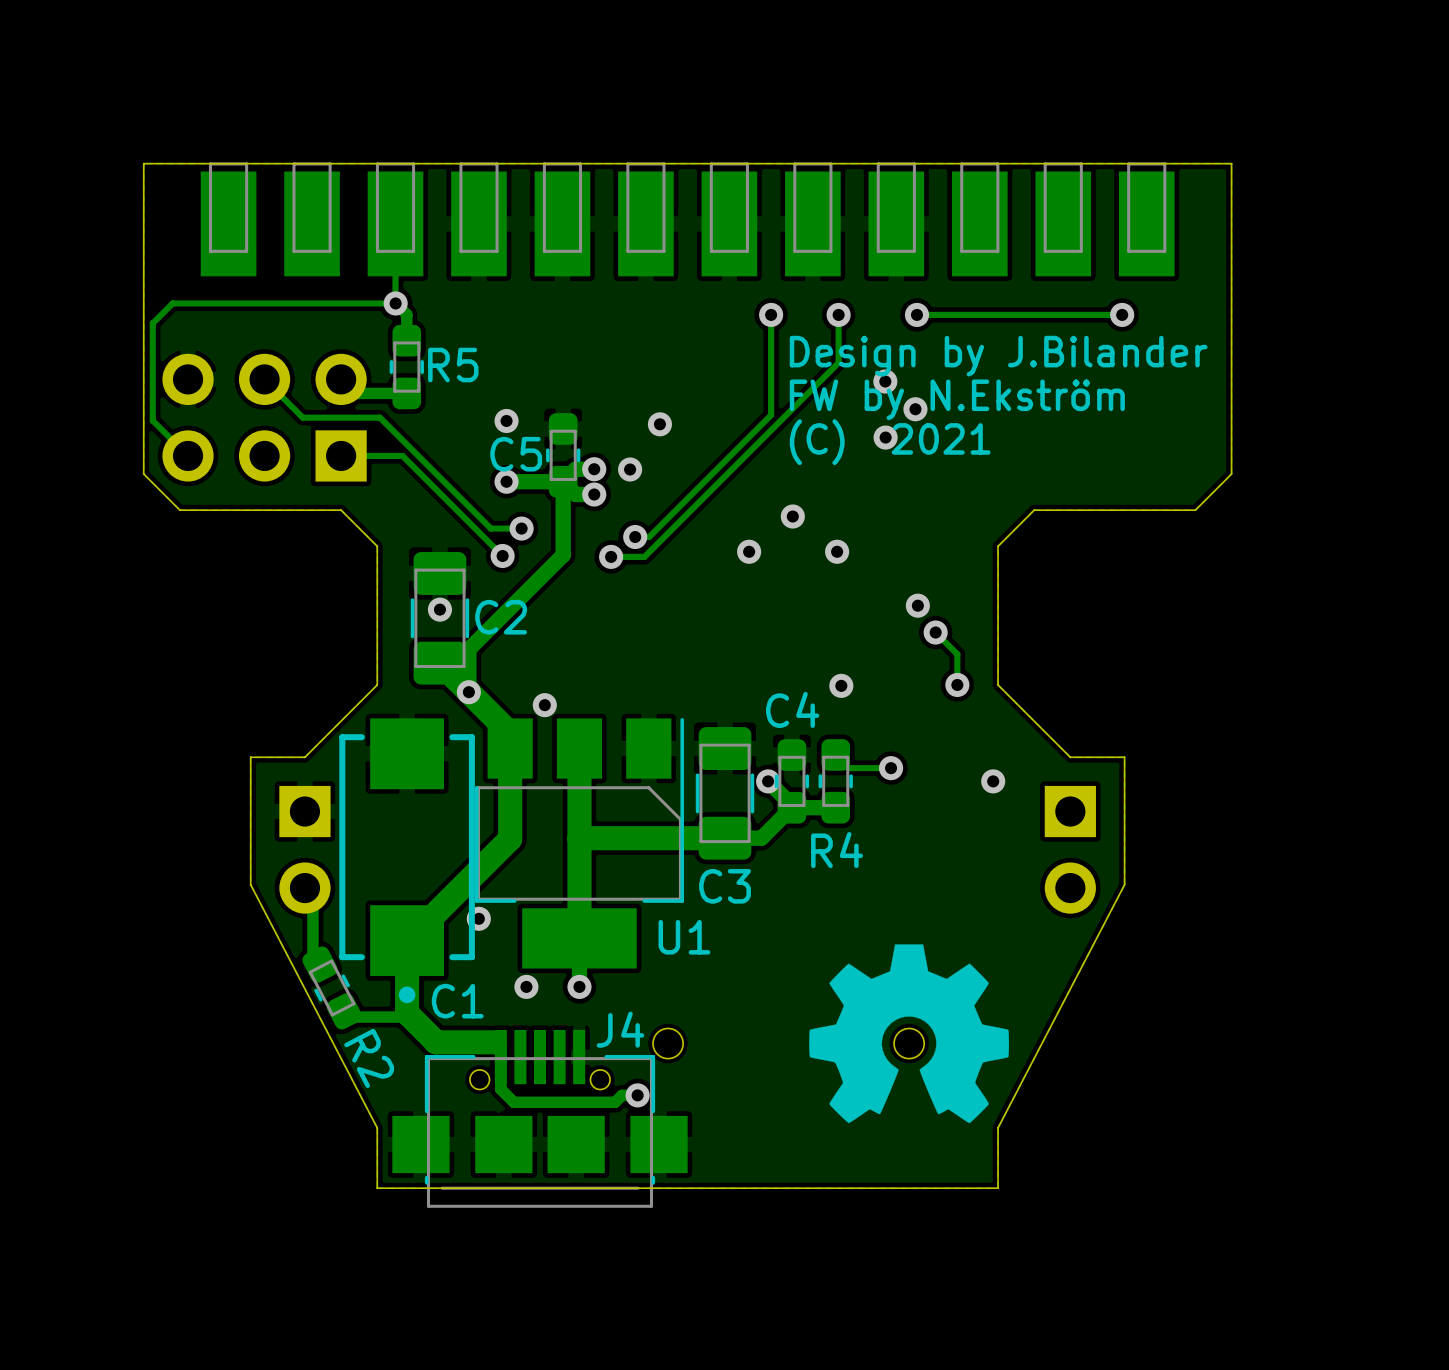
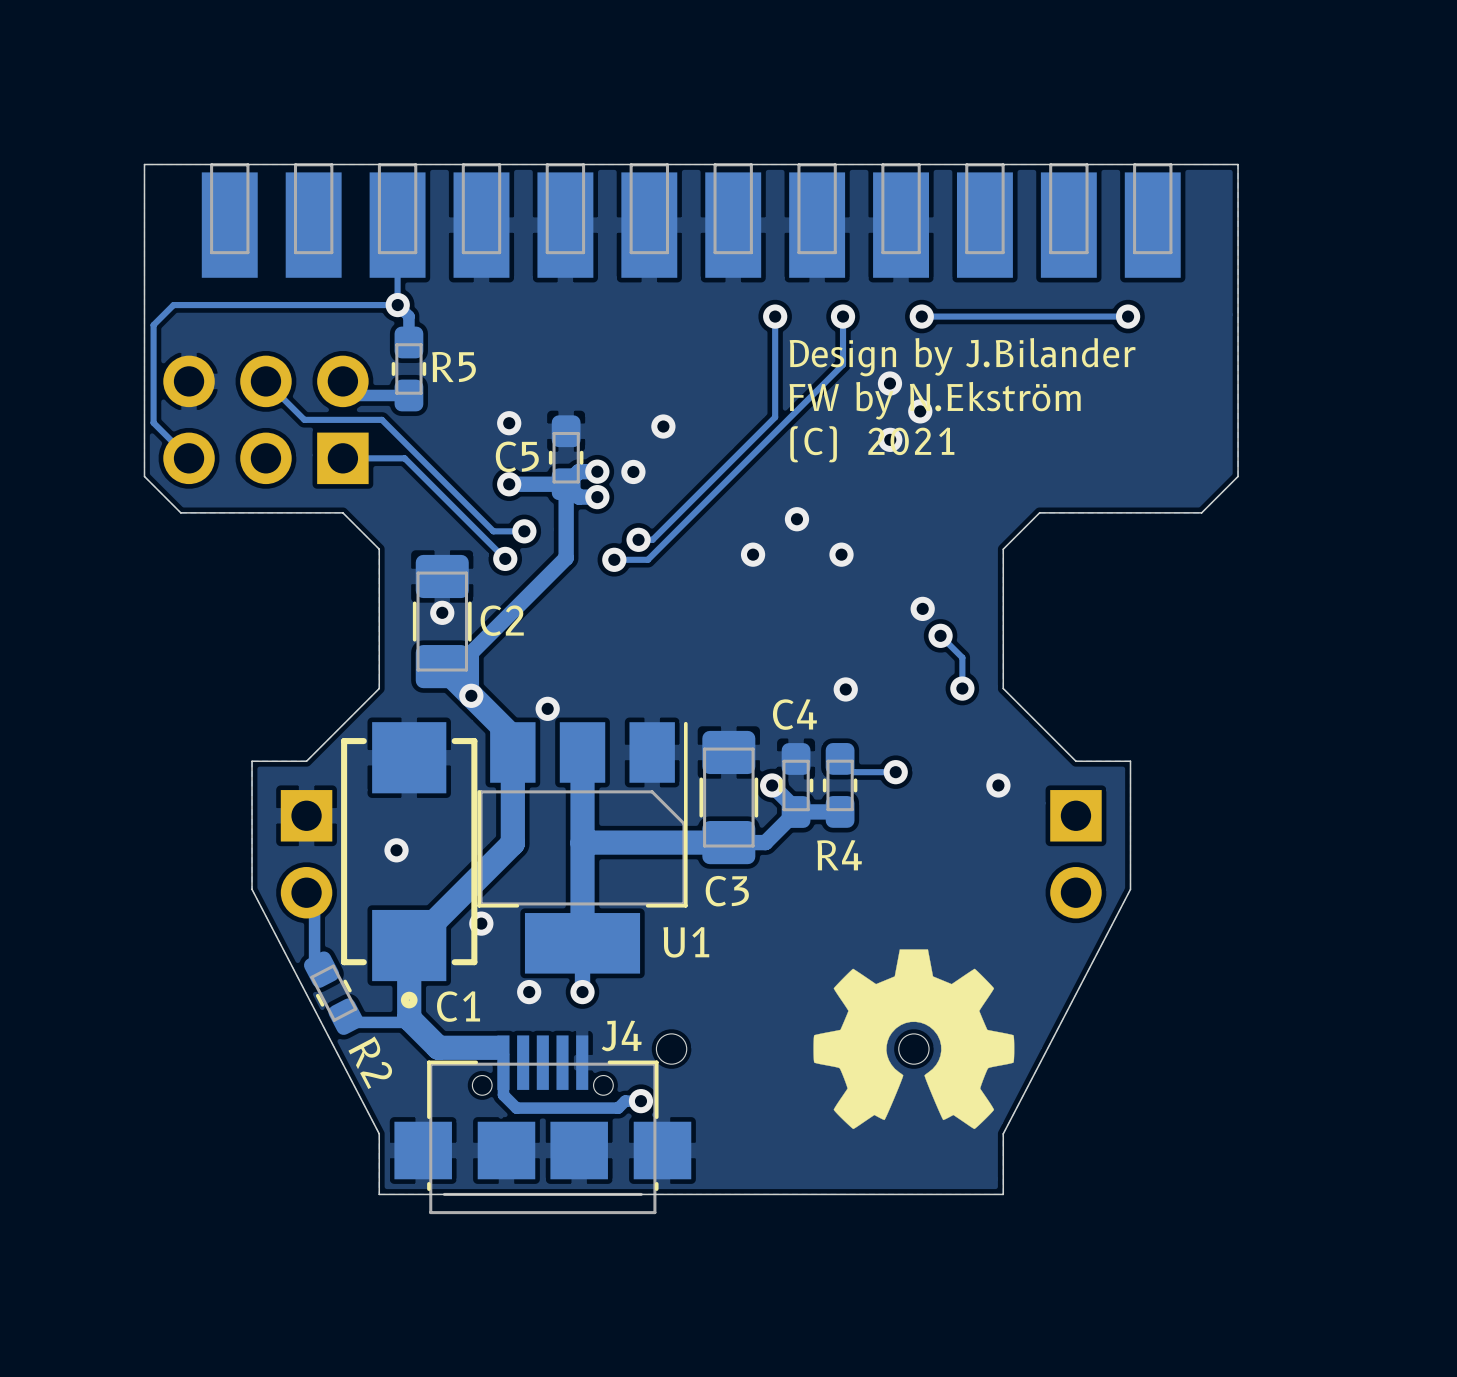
via: none -> (396, 850)

